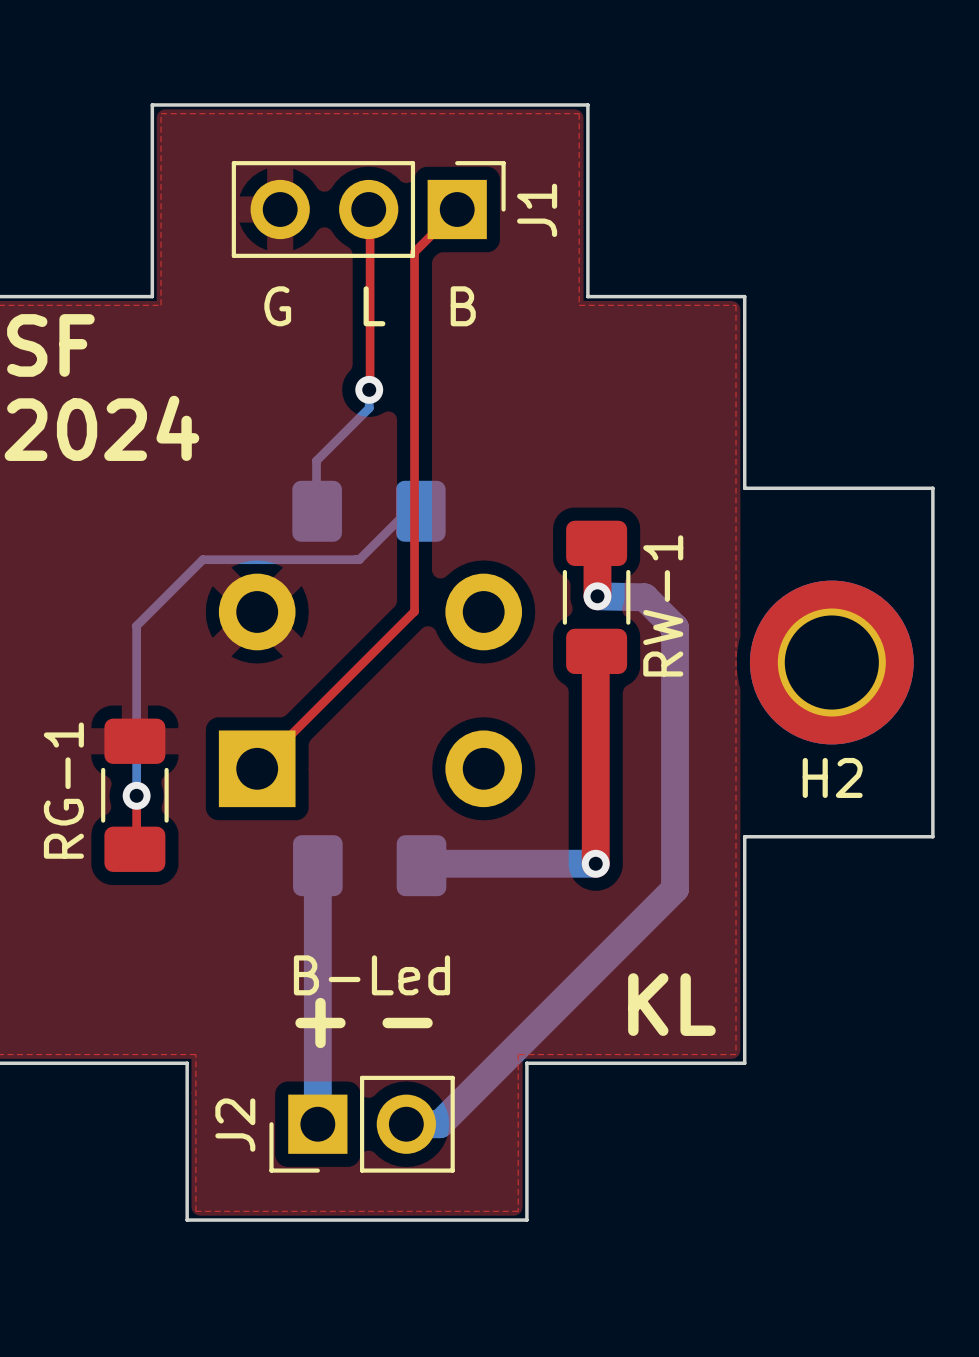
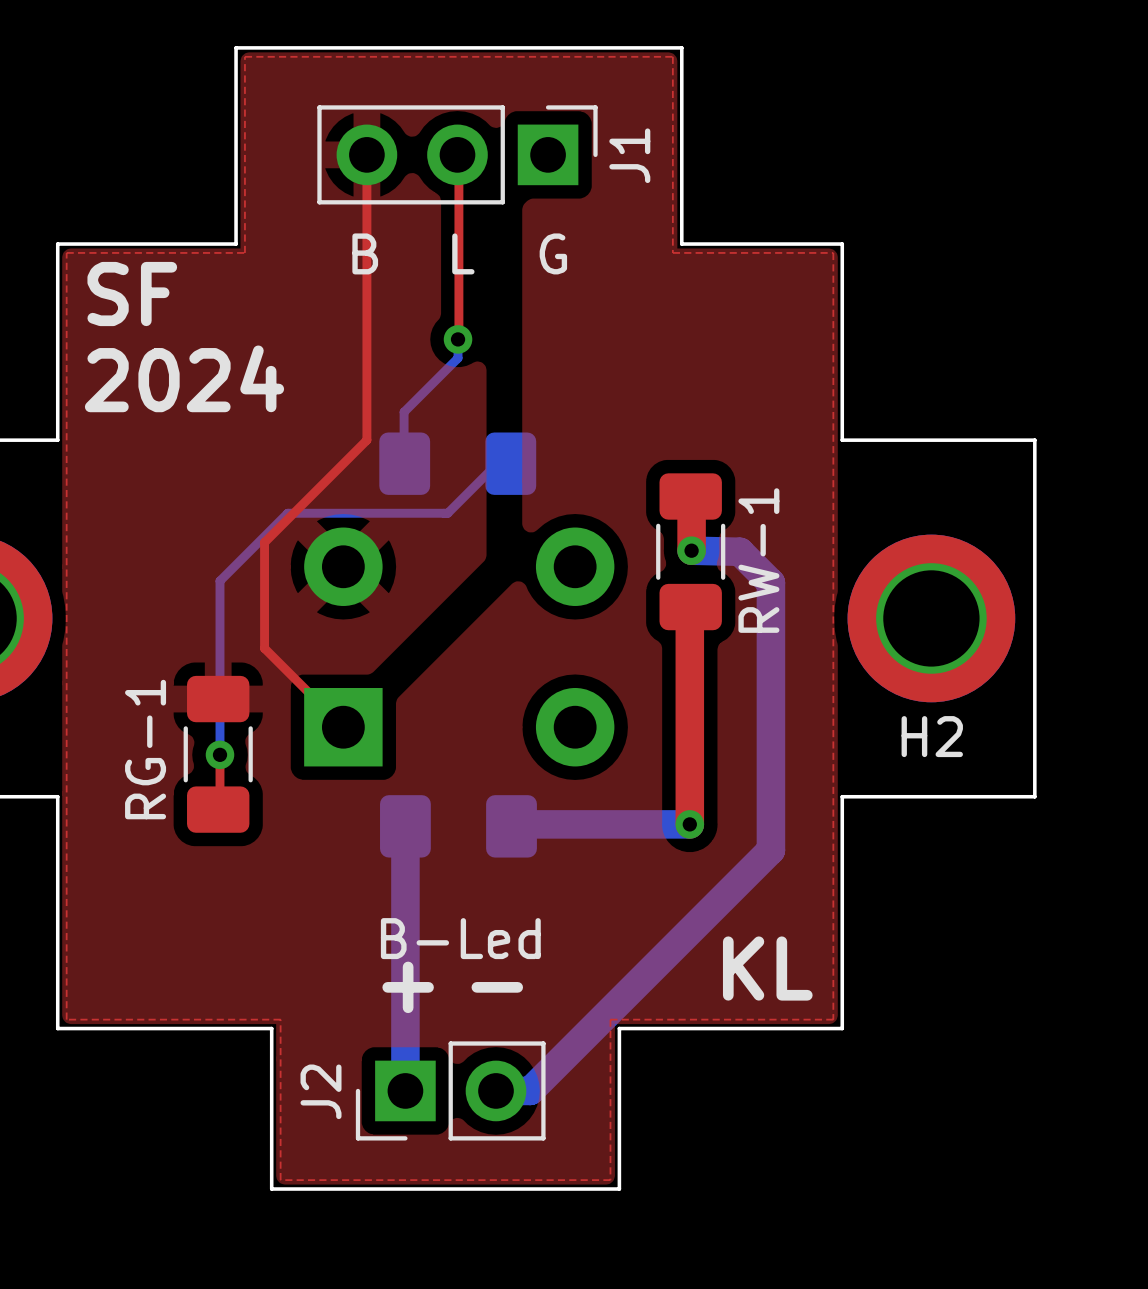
top track: (457, 209) (414, 252) (414, 611) (257, 768) -> (366, 154) (366, 440) (264, 542) (264, 648) (343, 727)
text: G (277, 306) -> B (365, 253)
text: B (463, 306) -> G (553, 253)

